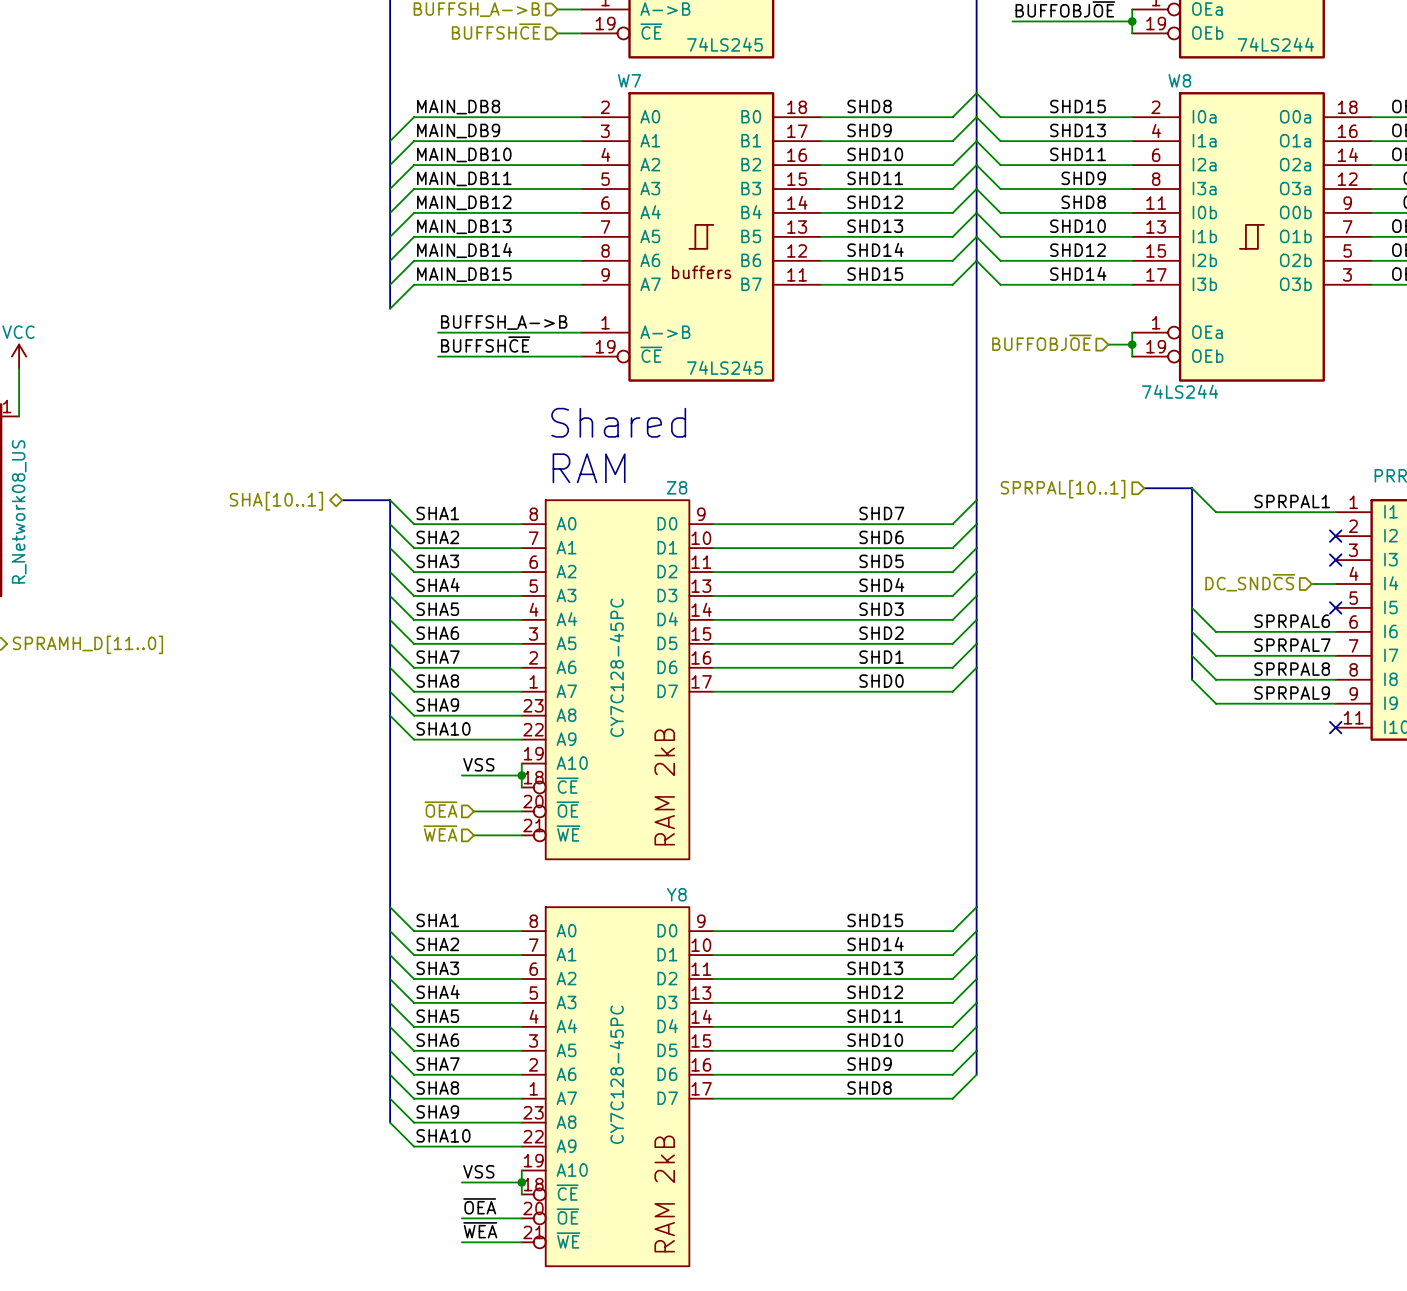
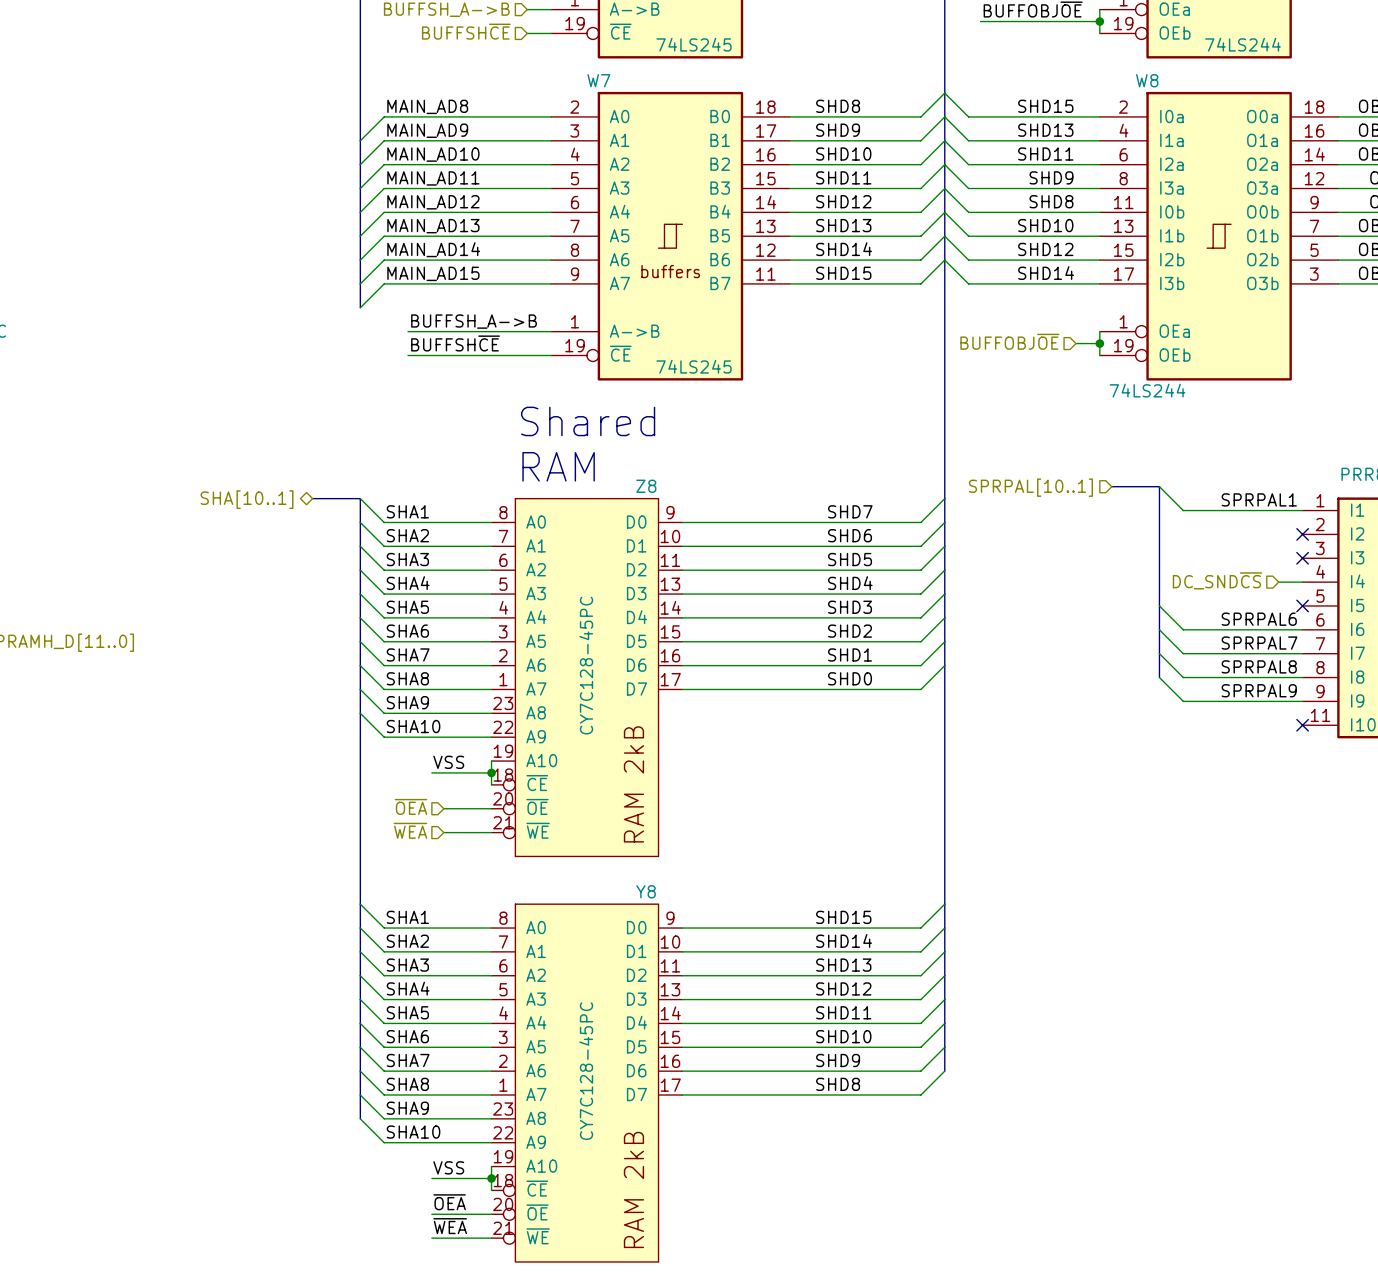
label: MAIN_DB8 (458, 107) -> MAIN_AD8 (427, 106)
label: MAIN_DB9 (458, 131) -> MAIN_AD9 (427, 130)
label: MAIN_DB10 (464, 154) -> MAIN_AD10 (433, 154)
label: MAIN_DB11 (464, 178) -> MAIN_AD11 (433, 178)
label: MAIN_DB12 (464, 202) -> MAIN_AD12 (433, 202)
label: MAIN_DB13 (464, 226) -> MAIN_AD13 (433, 226)
label: MAIN_DB14 (464, 250) -> MAIN_AD14 (433, 249)
label: MAIN_DB15 (464, 274) -> MAIN_AD15 (433, 273)

